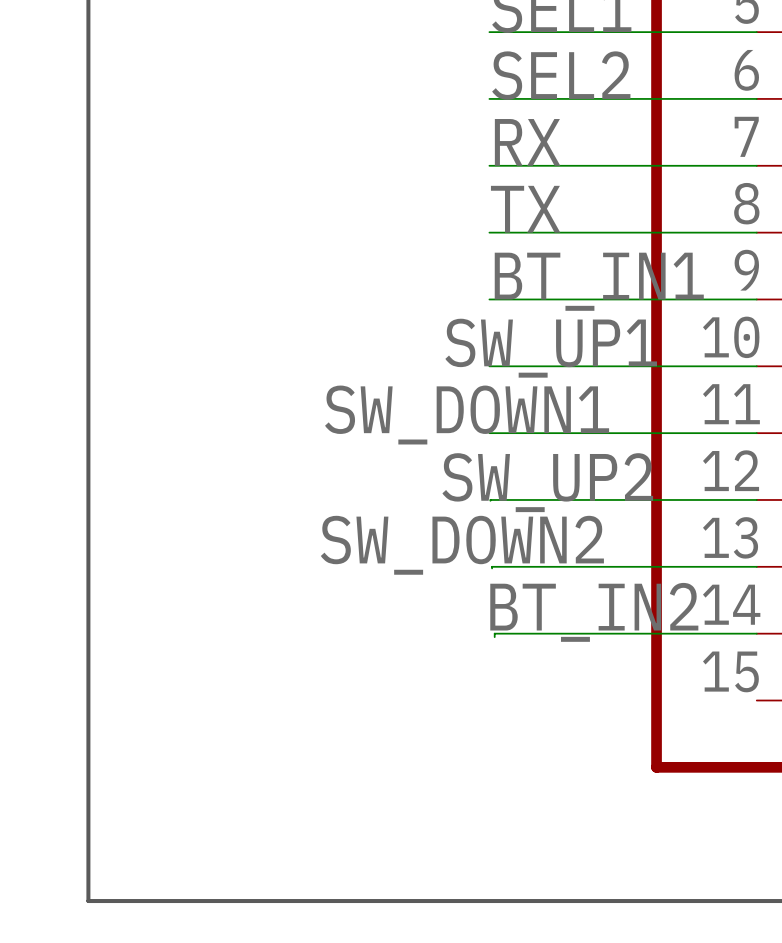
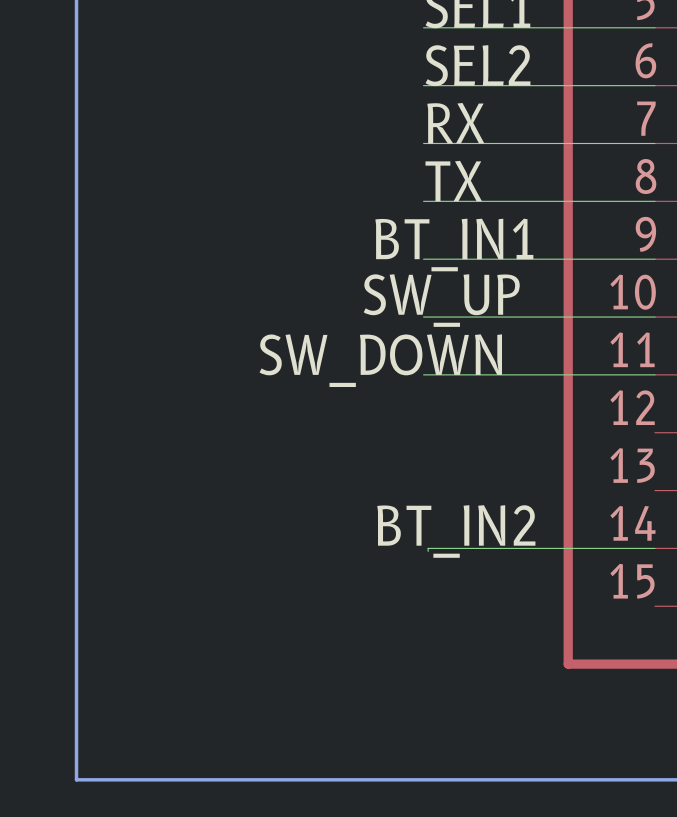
label position: BT_IN1 (599, 281) -> BT_IN1 (454, 245)
label: SW_UP1 (551, 348) -> SW_UP (441, 300)
label: SW_DOWN1 (467, 415) -> SW_DOWN (380, 360)
label: SW_UP2 (547, 482) -> none
wire: (756, 499) (490, 500) -> none
label: SW_DOWN2 (462, 545) -> none
wire: (756, 566) (492, 566) (492, 568) -> none
label position: BT_IN2 (594, 612) -> BT_IN2 (456, 531)

